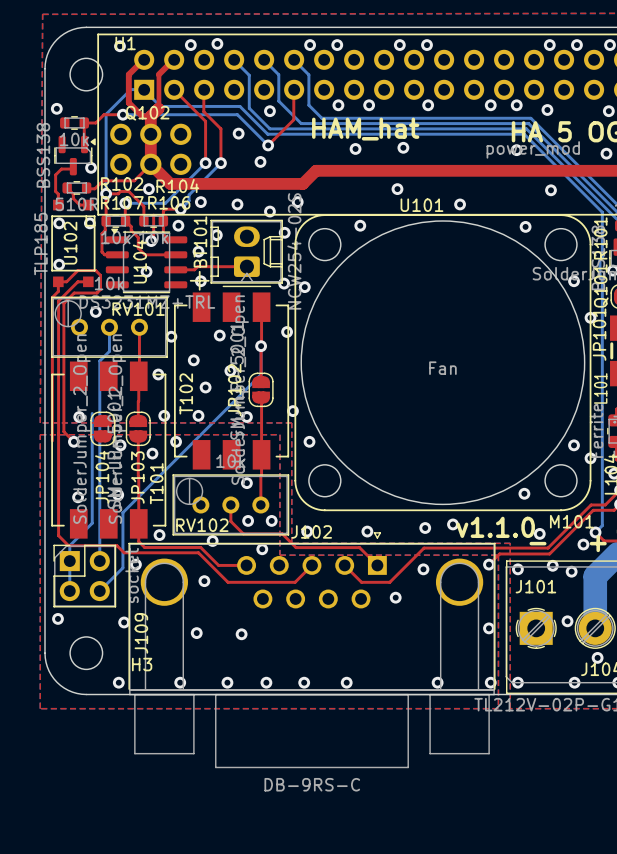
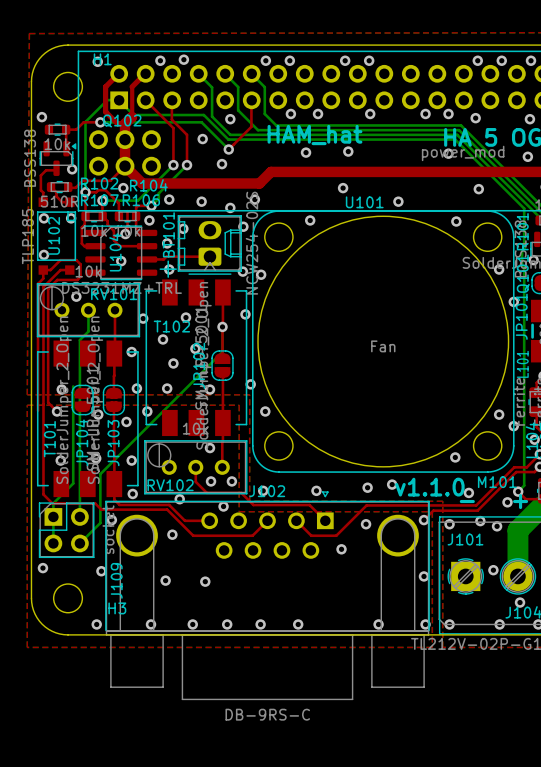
U104 footprint: [105, 228, 188, 294] -> [84, 225, 158, 281]
T102 name rotation: 0° (186, 393) -> 90° clockwise (171, 326)
T101 name position: T101 (156, 483) -> T101 (49, 439)
via: none -> (131, 460)

